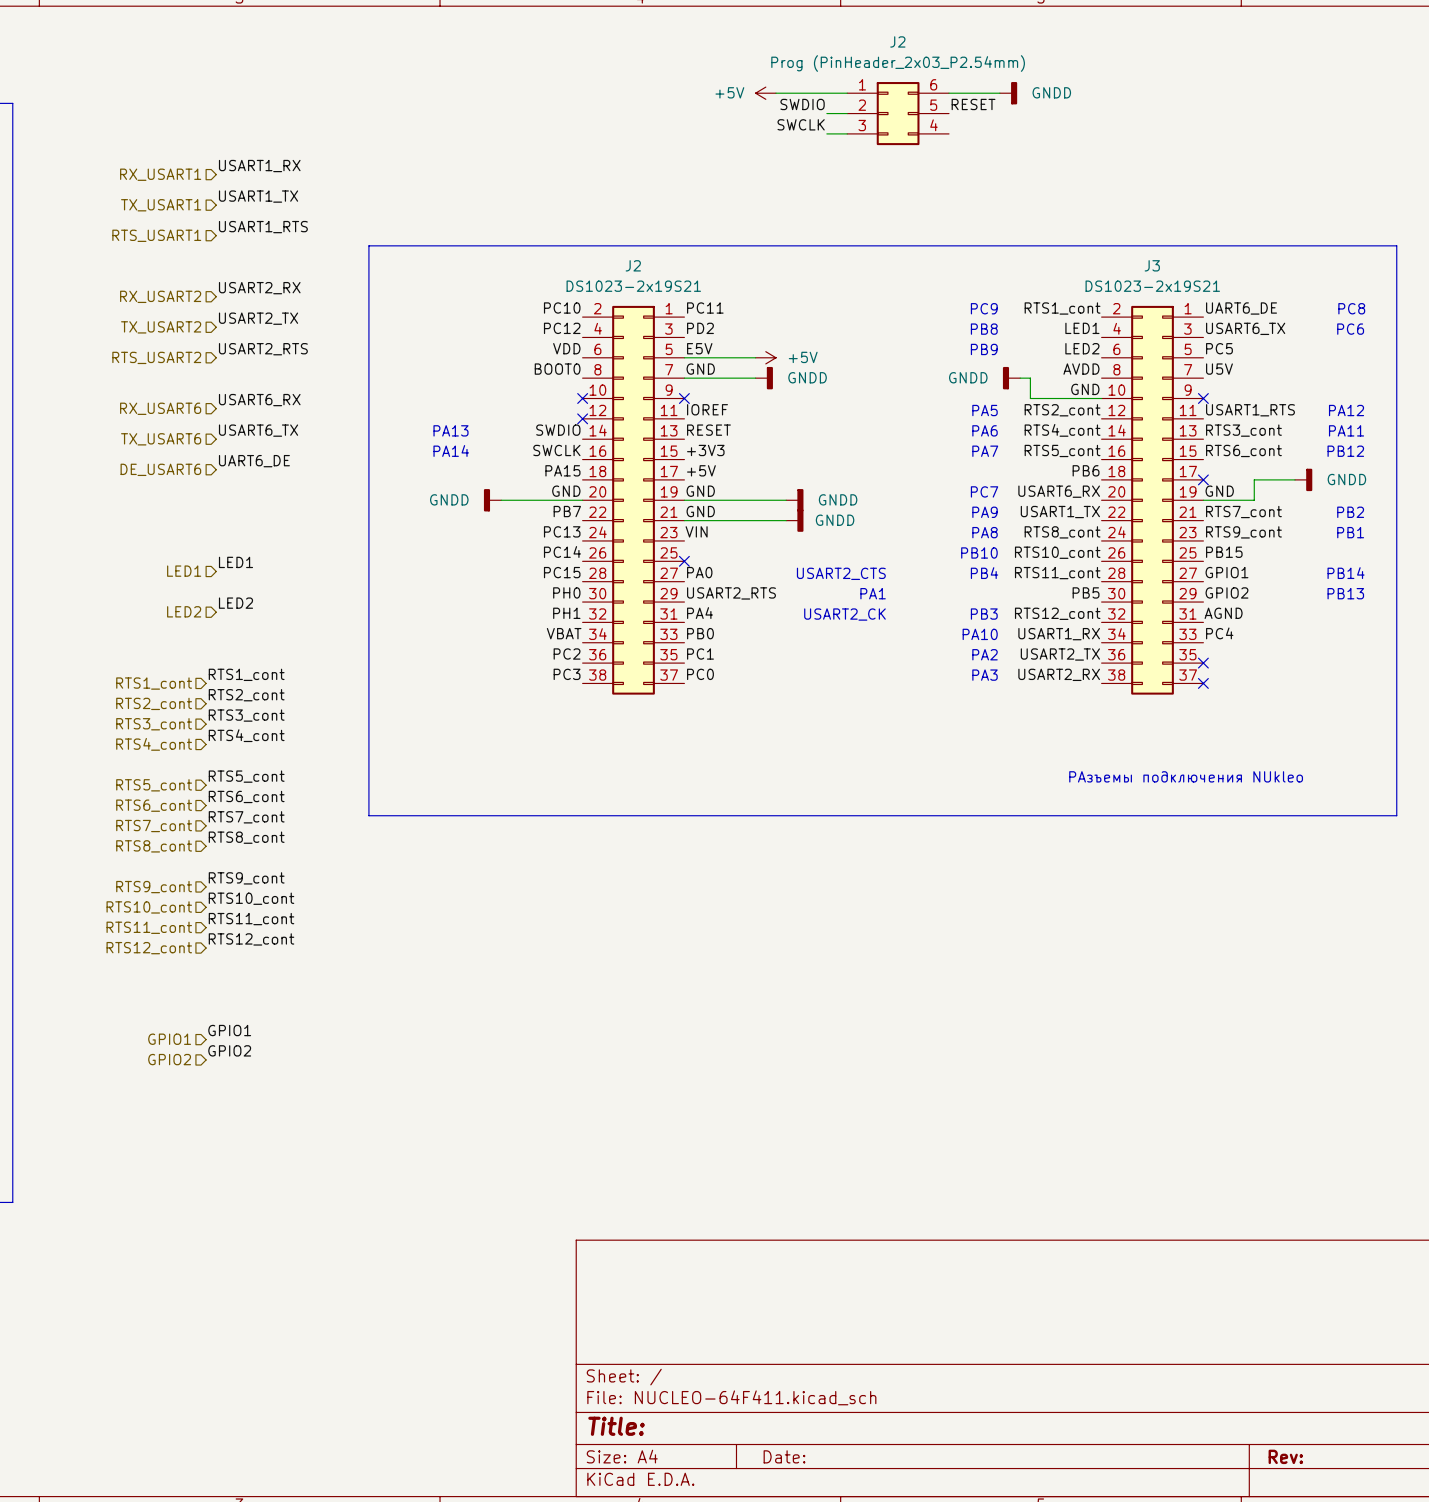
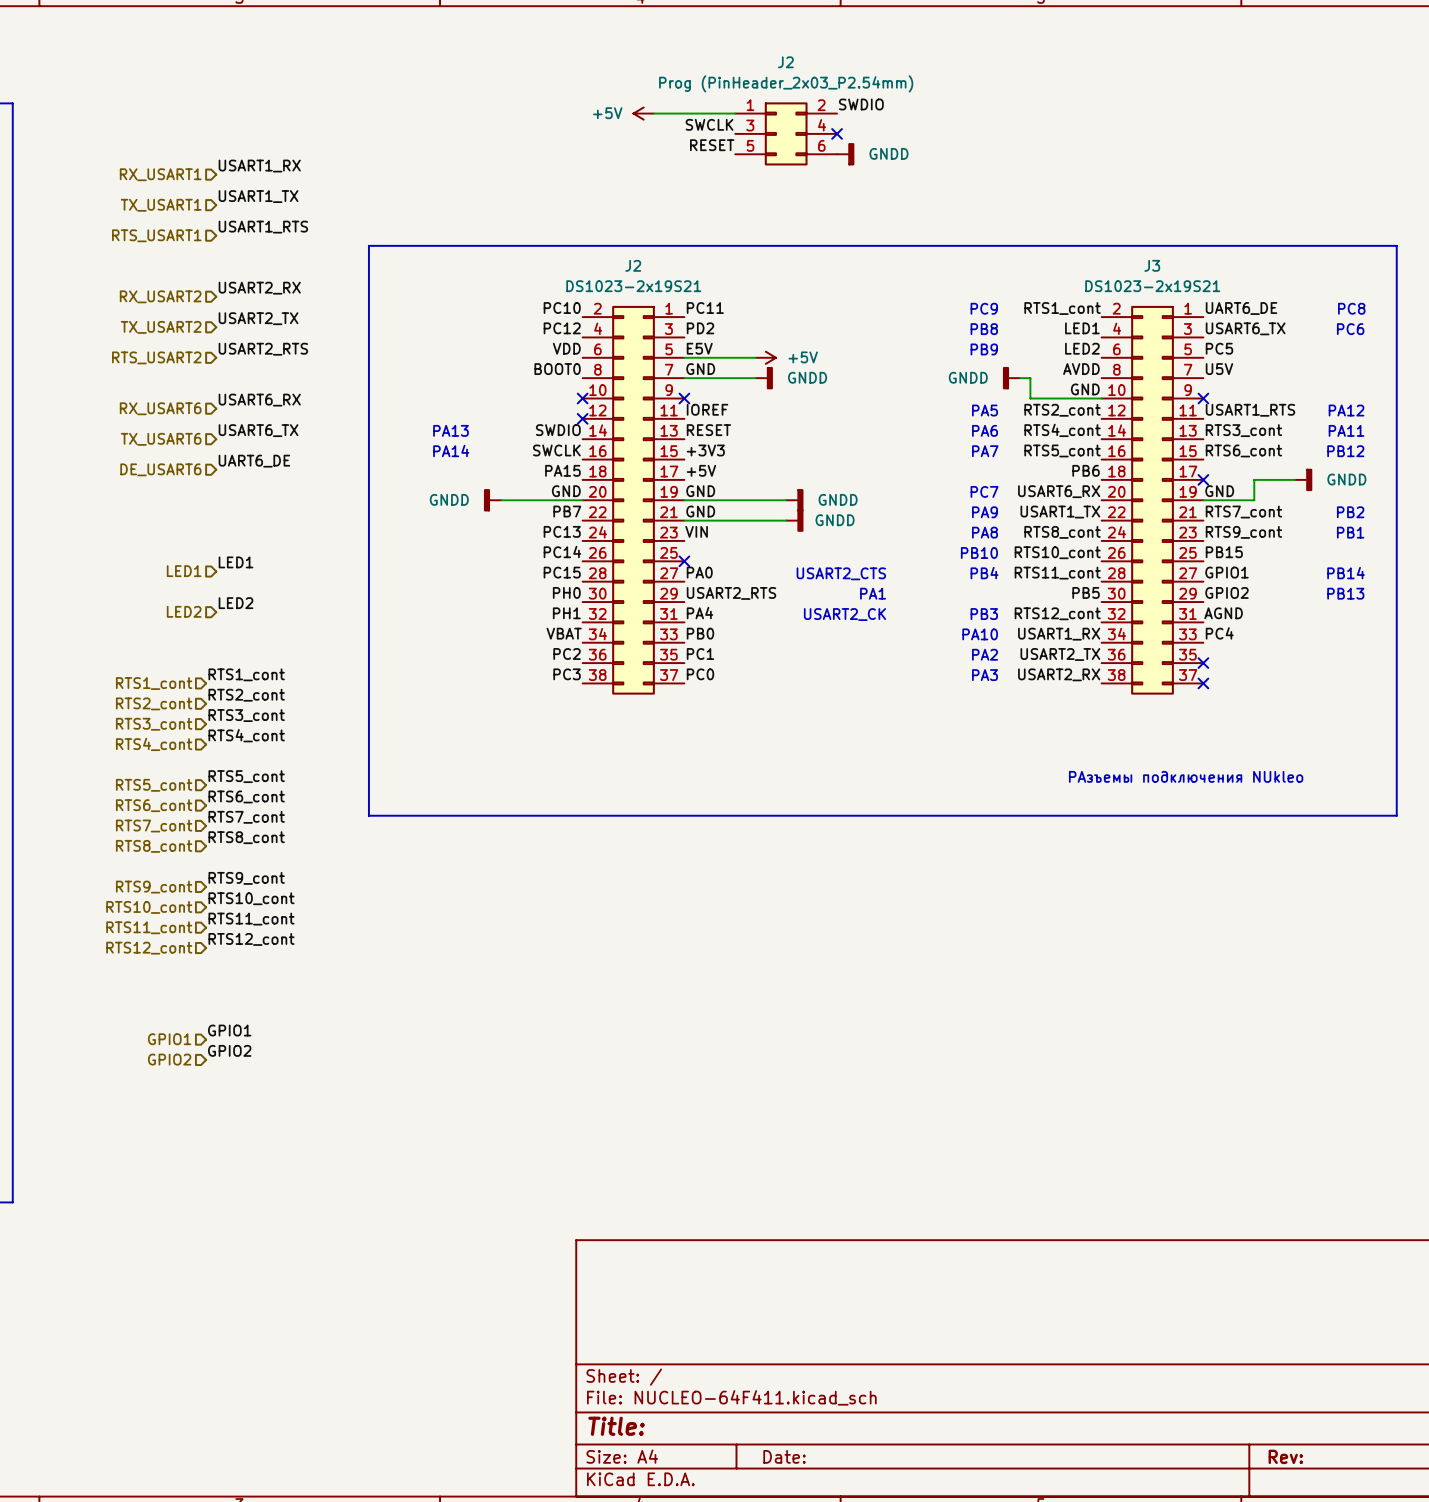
power symbol position: +5V (765, 93) -> +5V (643, 113)
wire: (775, 93) (847, 93) -> none
wire: (948, 93) (999, 93) -> none
power symbol position: GNDD (1008, 93) -> GNDD (845, 154)
label position: SWDIO (802, 104) -> SWDIO (861, 104)
label: RESET (973, 104) -> none
wire: none -> (653, 113) (735, 113)
wire: (826, 113) (847, 113) -> none
J2: Prog (PinHeader_2x03_P2.54mm) (898, 113) -> none
label position: SWCLK (801, 124) -> SWCLK (709, 124)
J2: none -> Prog (PinHeader_2x03_P2.54mm) (786, 133)
no-connect mark: none -> (837, 133)
label: none -> RESET (712, 145)

